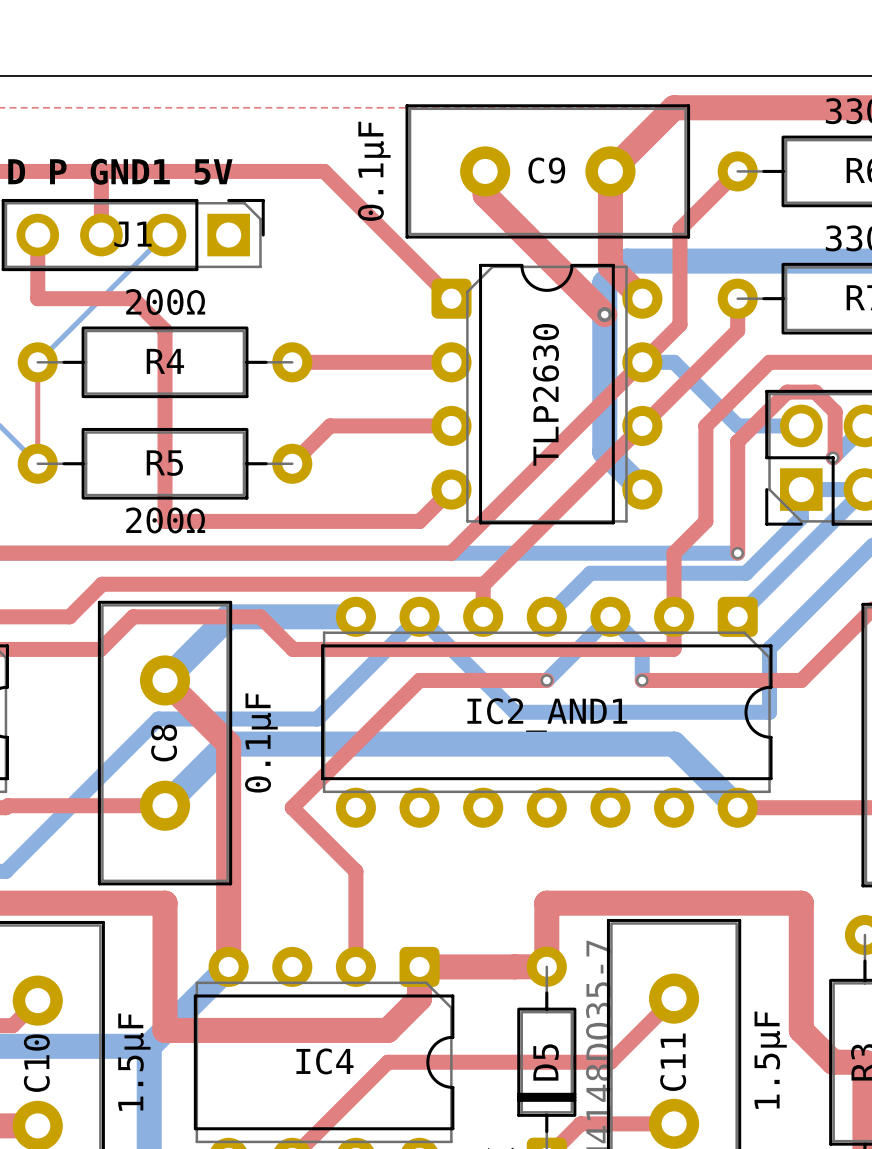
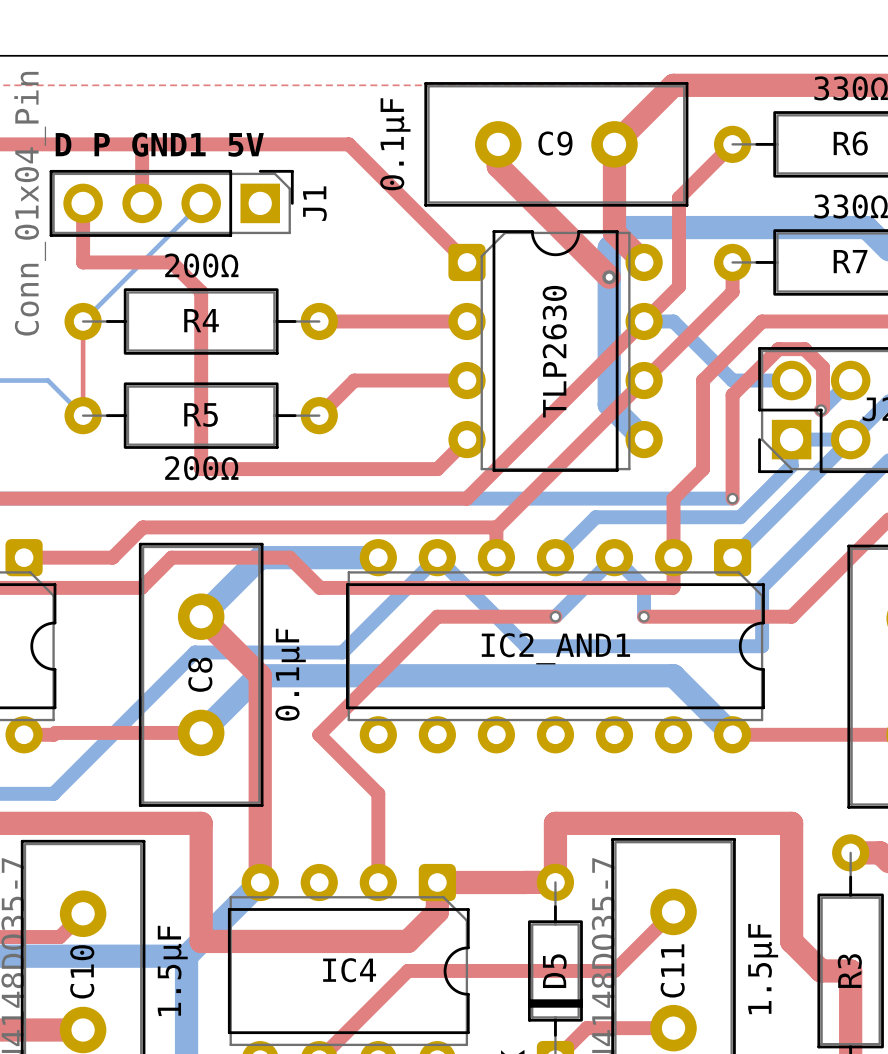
J1 name rotation: 0° (132, 234) -> 90° counterclockwise (314, 203)
J1 name position: J1 (132, 234) -> J1 (314, 203)

